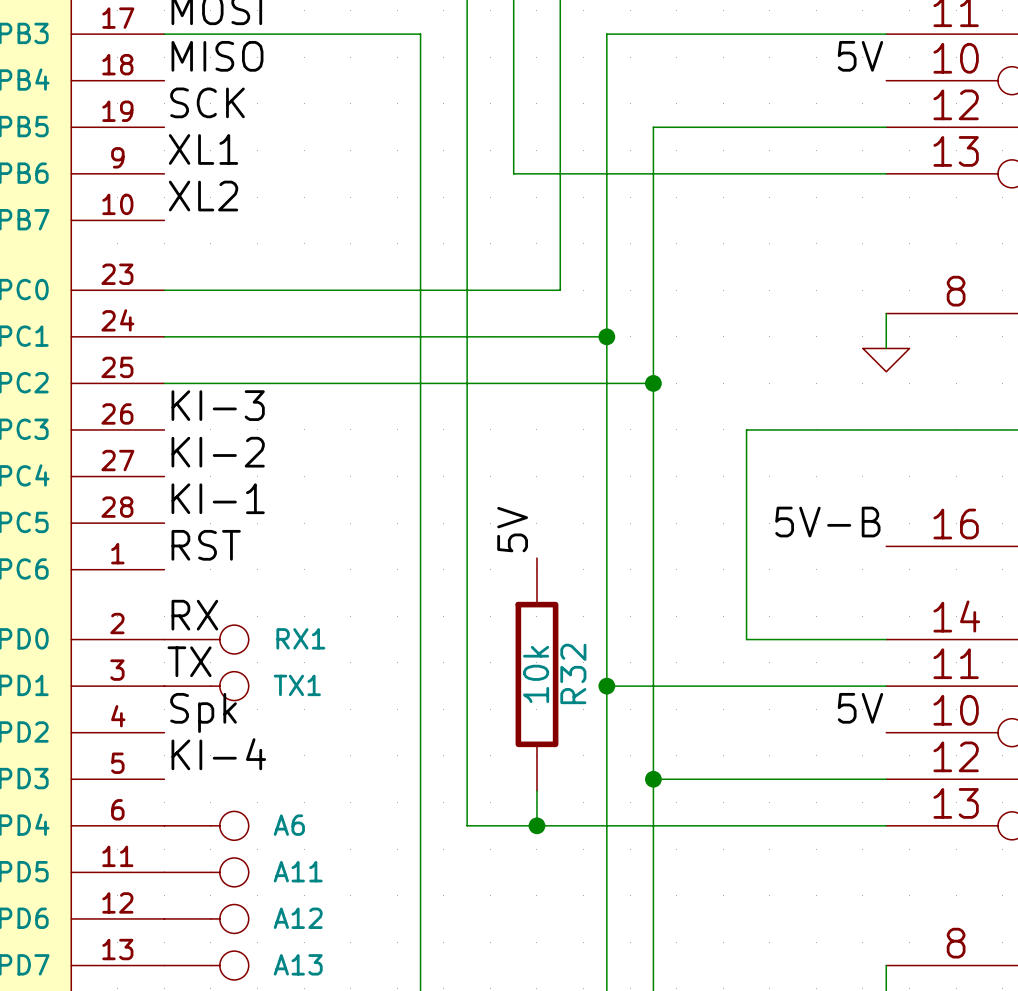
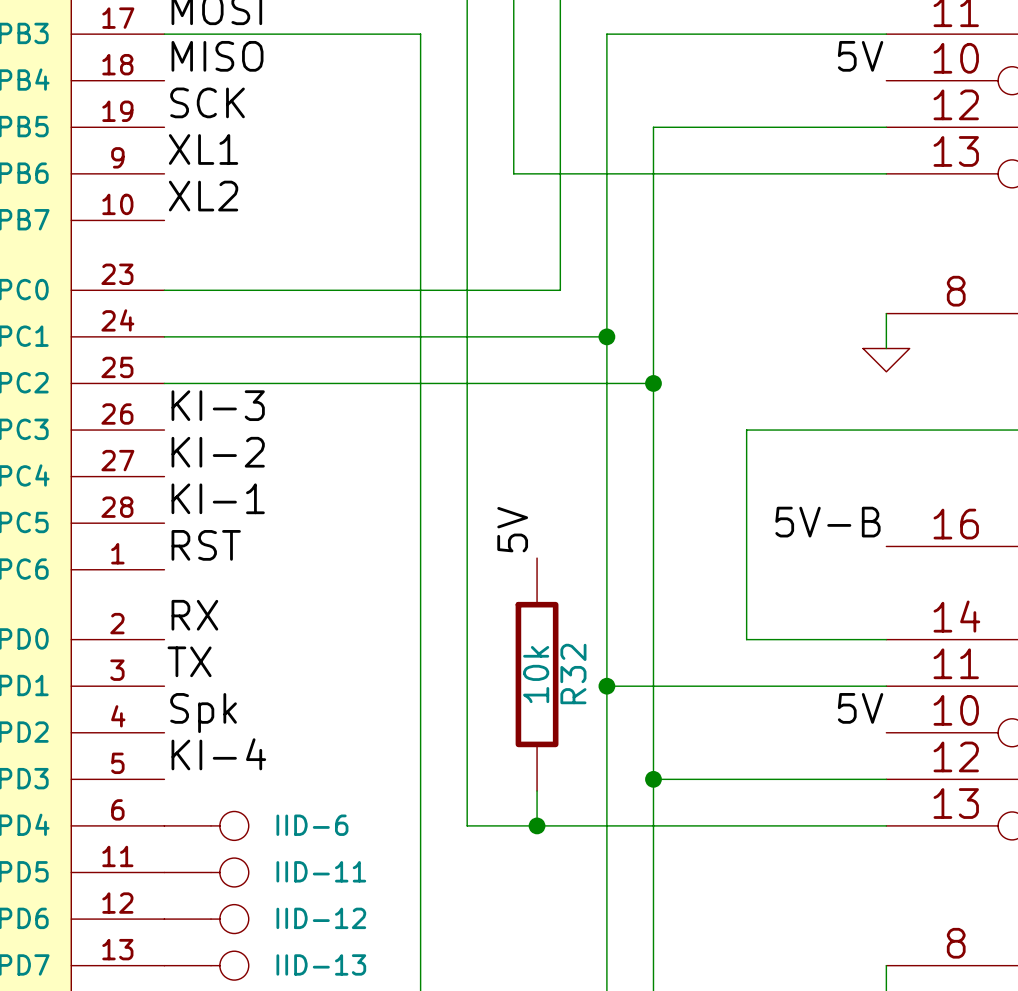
RX1: (206, 639) -> none
TX1: (206, 686) -> none
A6 name: A6 (289, 825) -> IID-6 (312, 825)
A11 name: A11 (298, 871) -> IID-11 (321, 871)
A12 name: A12 (298, 918) -> IID-12 (321, 918)
A13 name: A13 (298, 964) -> IID-13 (321, 964)

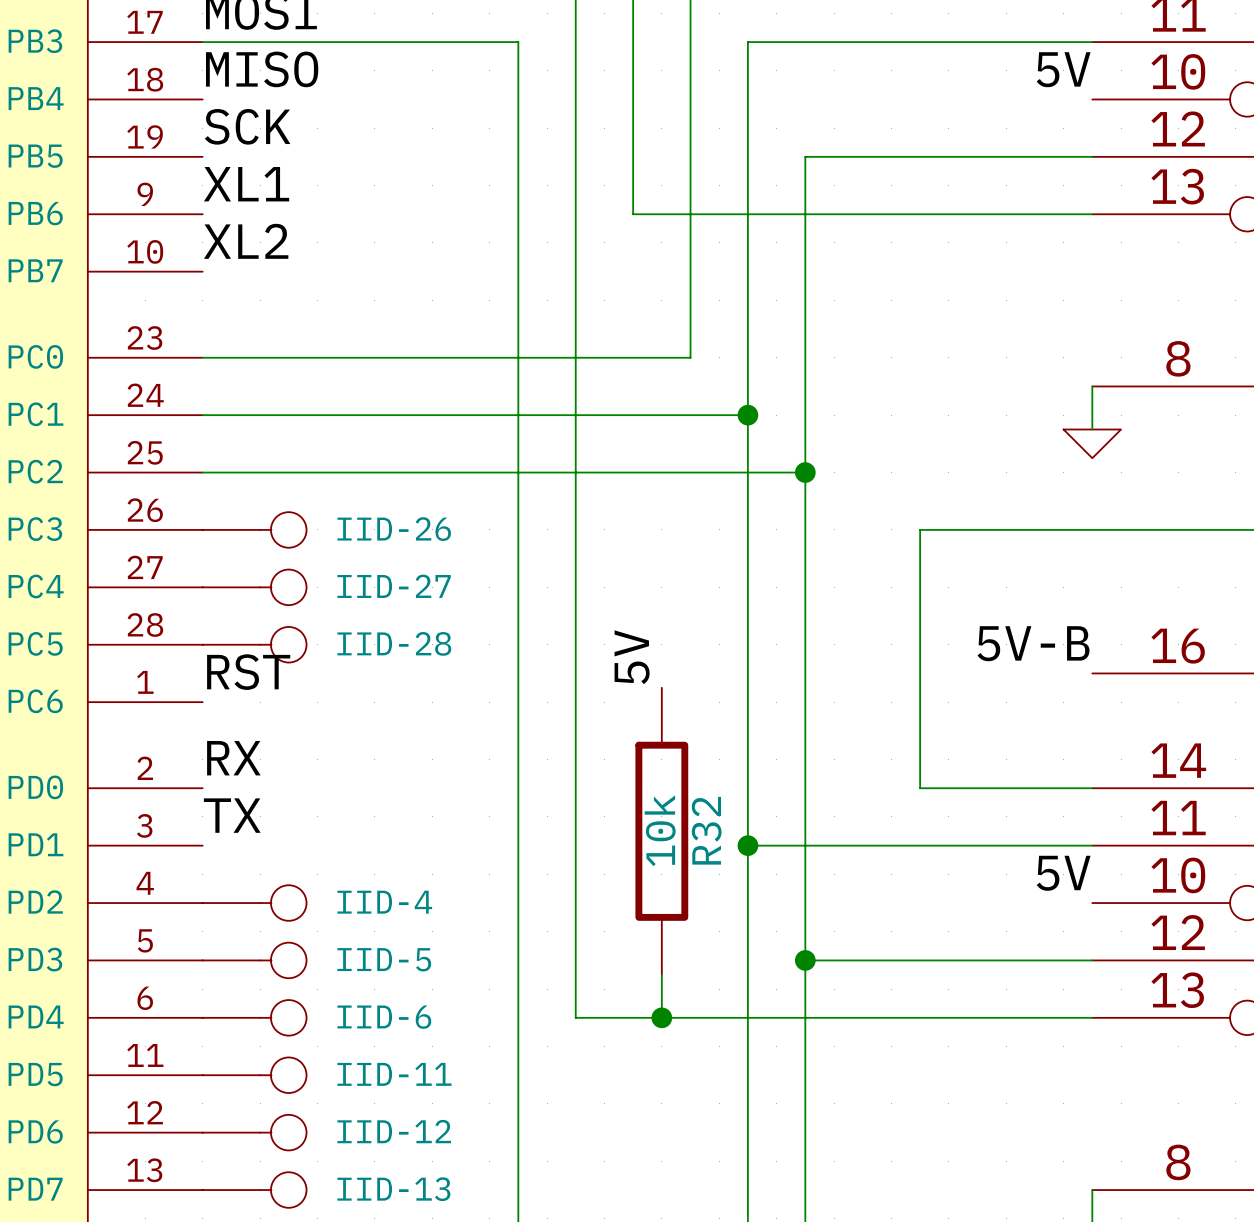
label: KI-3 (218, 405) -> none
IID-26: none -> (254, 529)
label: KI-2 (218, 452) -> none
IID-27: none -> (254, 587)
label: KI-1 (218, 498) -> none
IID-28: none -> (254, 644)
label: Spk (203, 713) -> none
IID-4: none -> (254, 903)
label: KI-4 (218, 754) -> none
IID-5: none -> (254, 960)

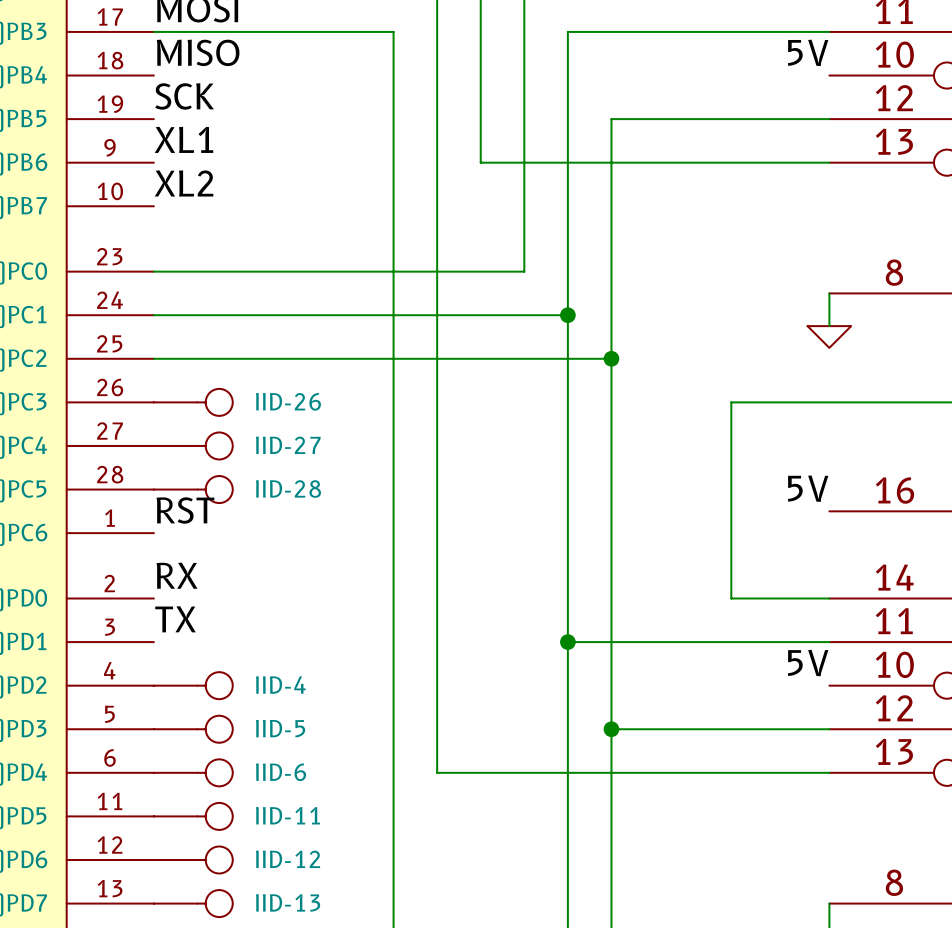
wire: (963, 529) (920, 529) (920, 788) (963, 788) -> (731, 402) (731, 598)
label: 5V-B (1033, 643) -> 5V (808, 488)
label: 5V (632, 657) -> none
R32: 10k (661, 831) -> none
wire: (661, 974) (661, 1017) -> none
junction: (661, 1017) -> none

